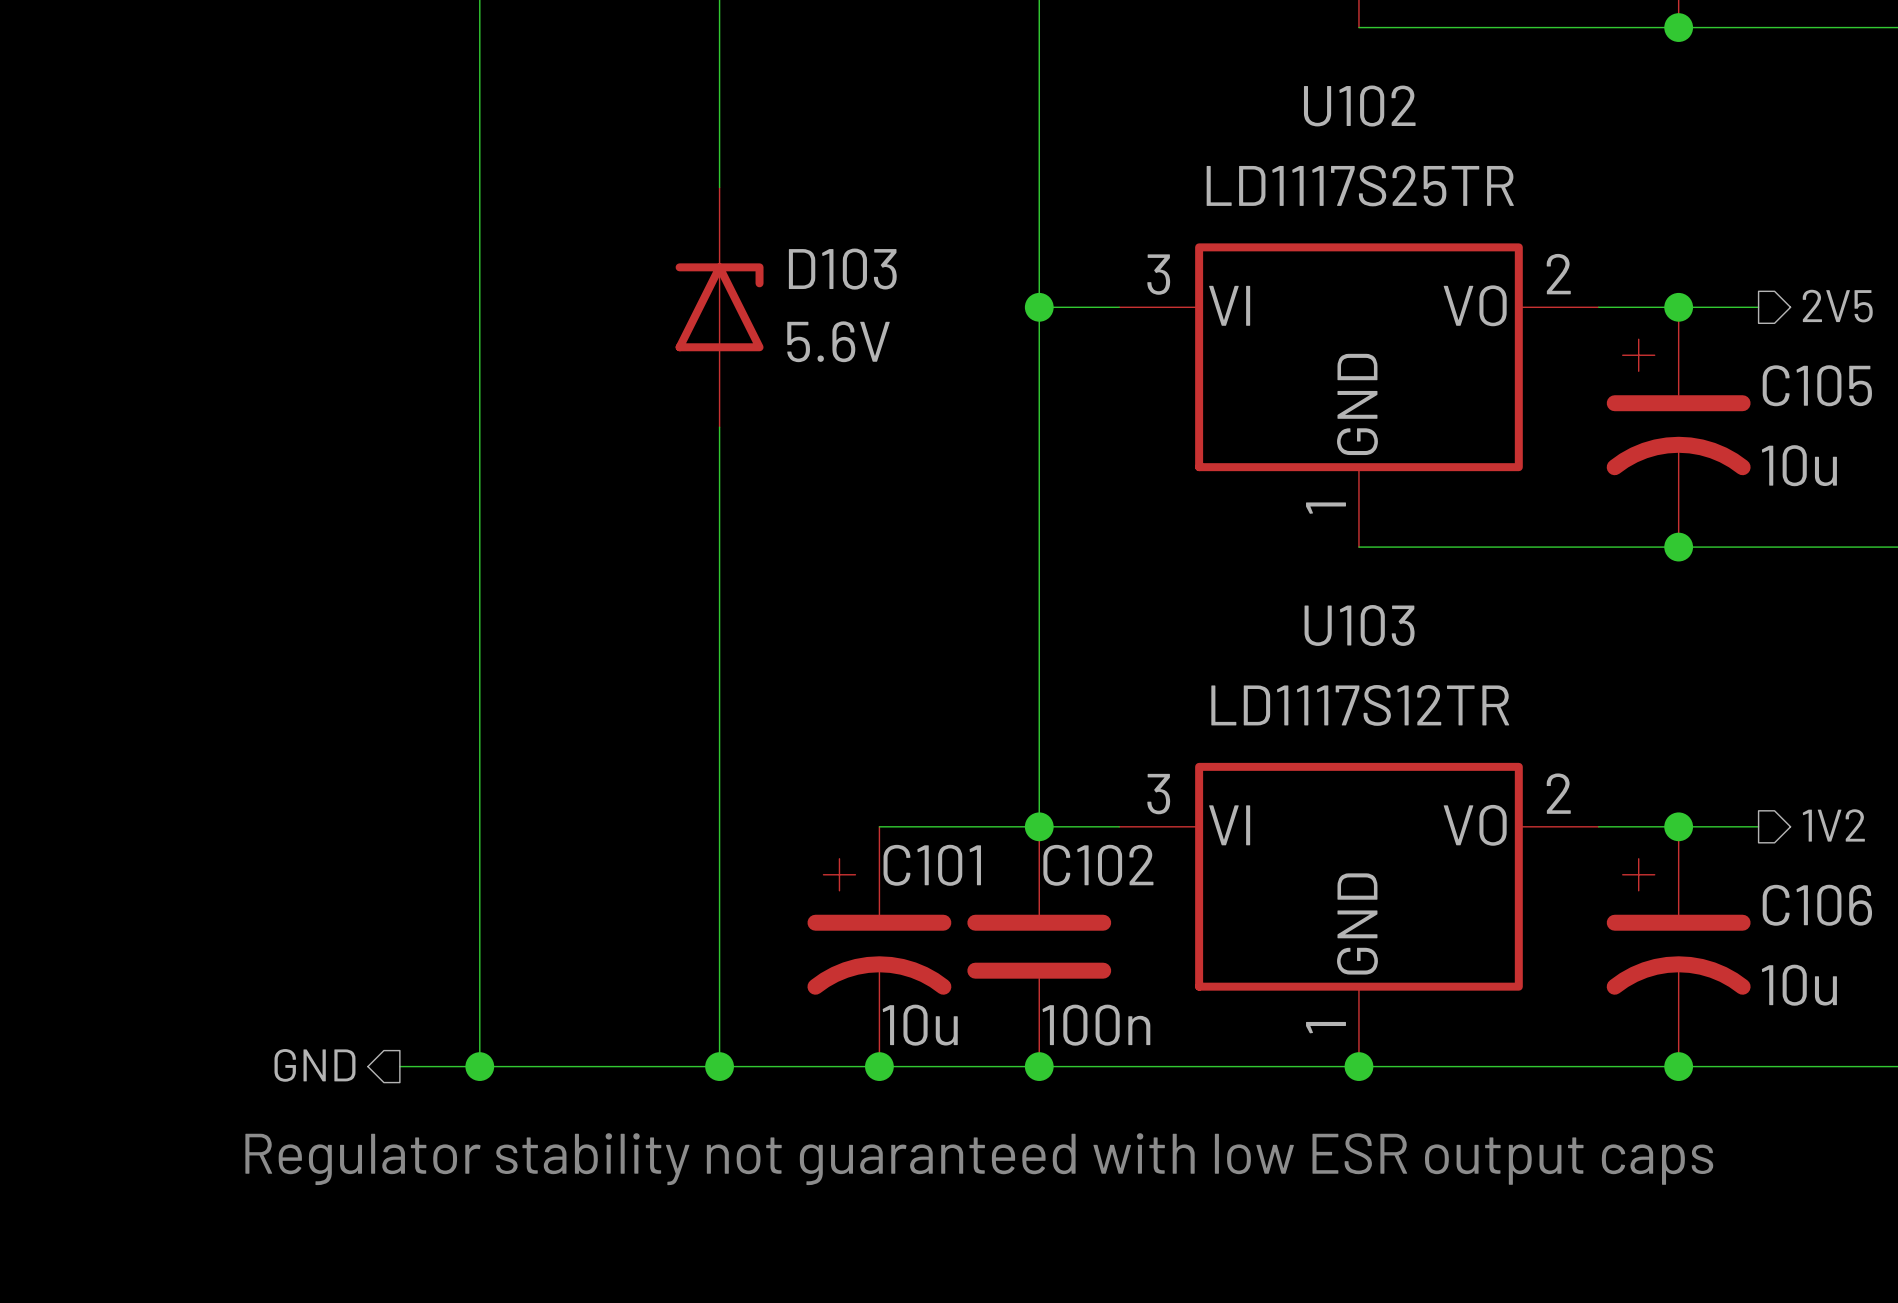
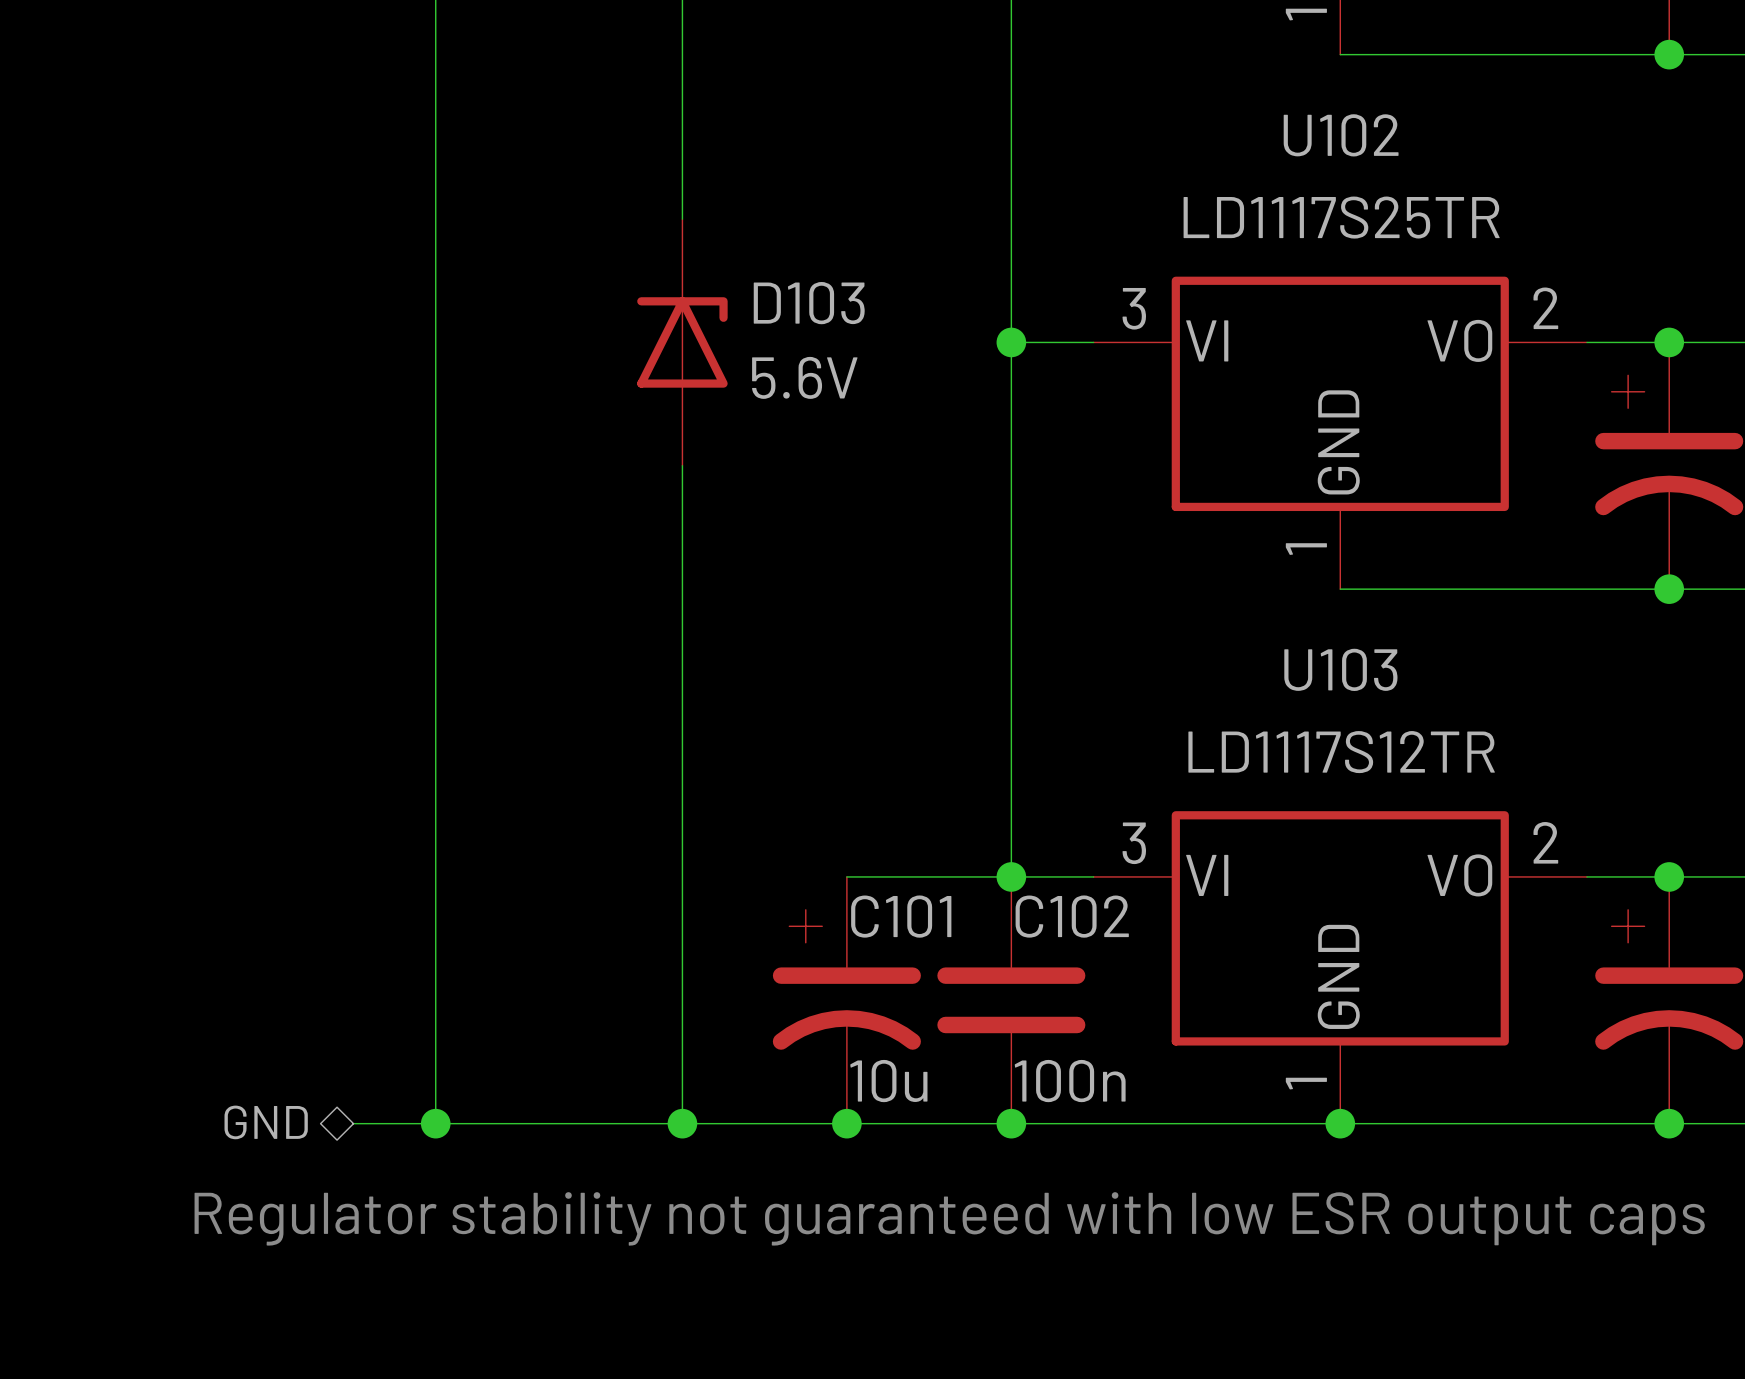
hierarchical label shape: output (314, 1065) -> bidirectional (266, 1122)

